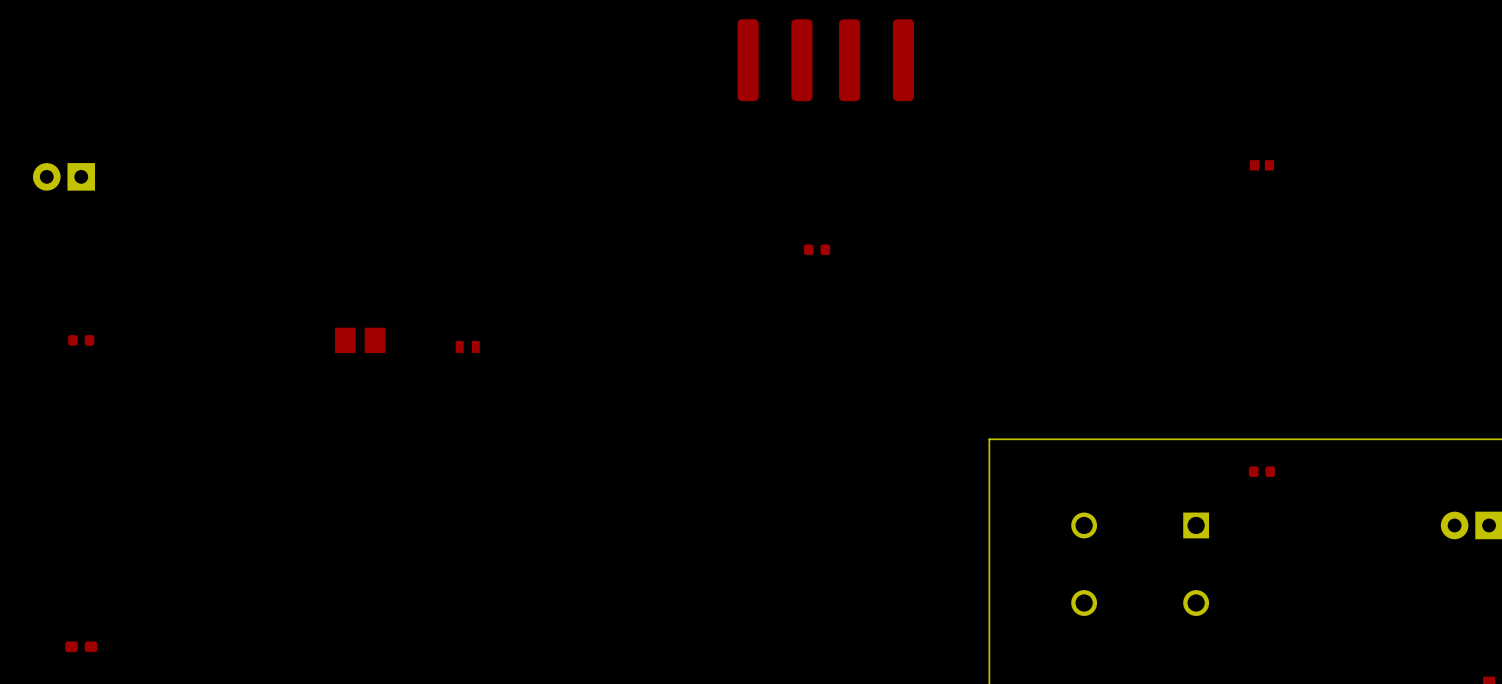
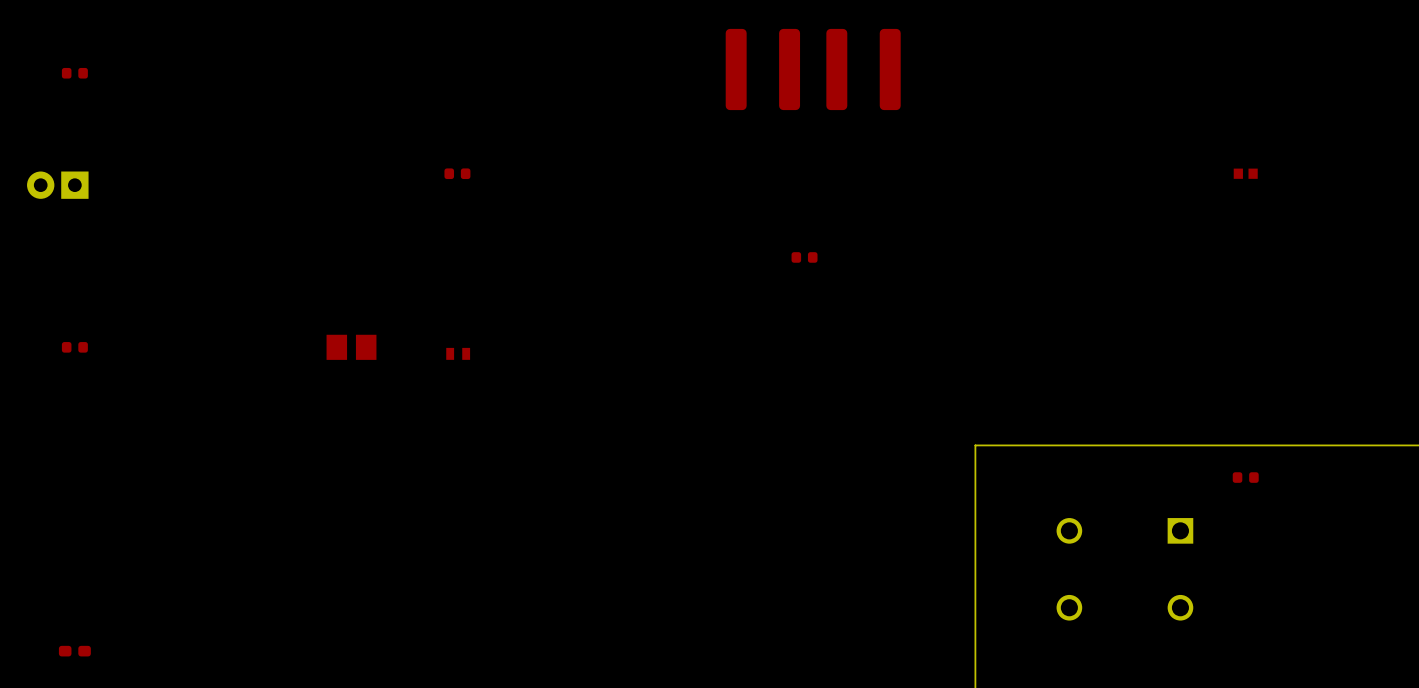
part: none -> (74, 73)
part: none -> (457, 173)

